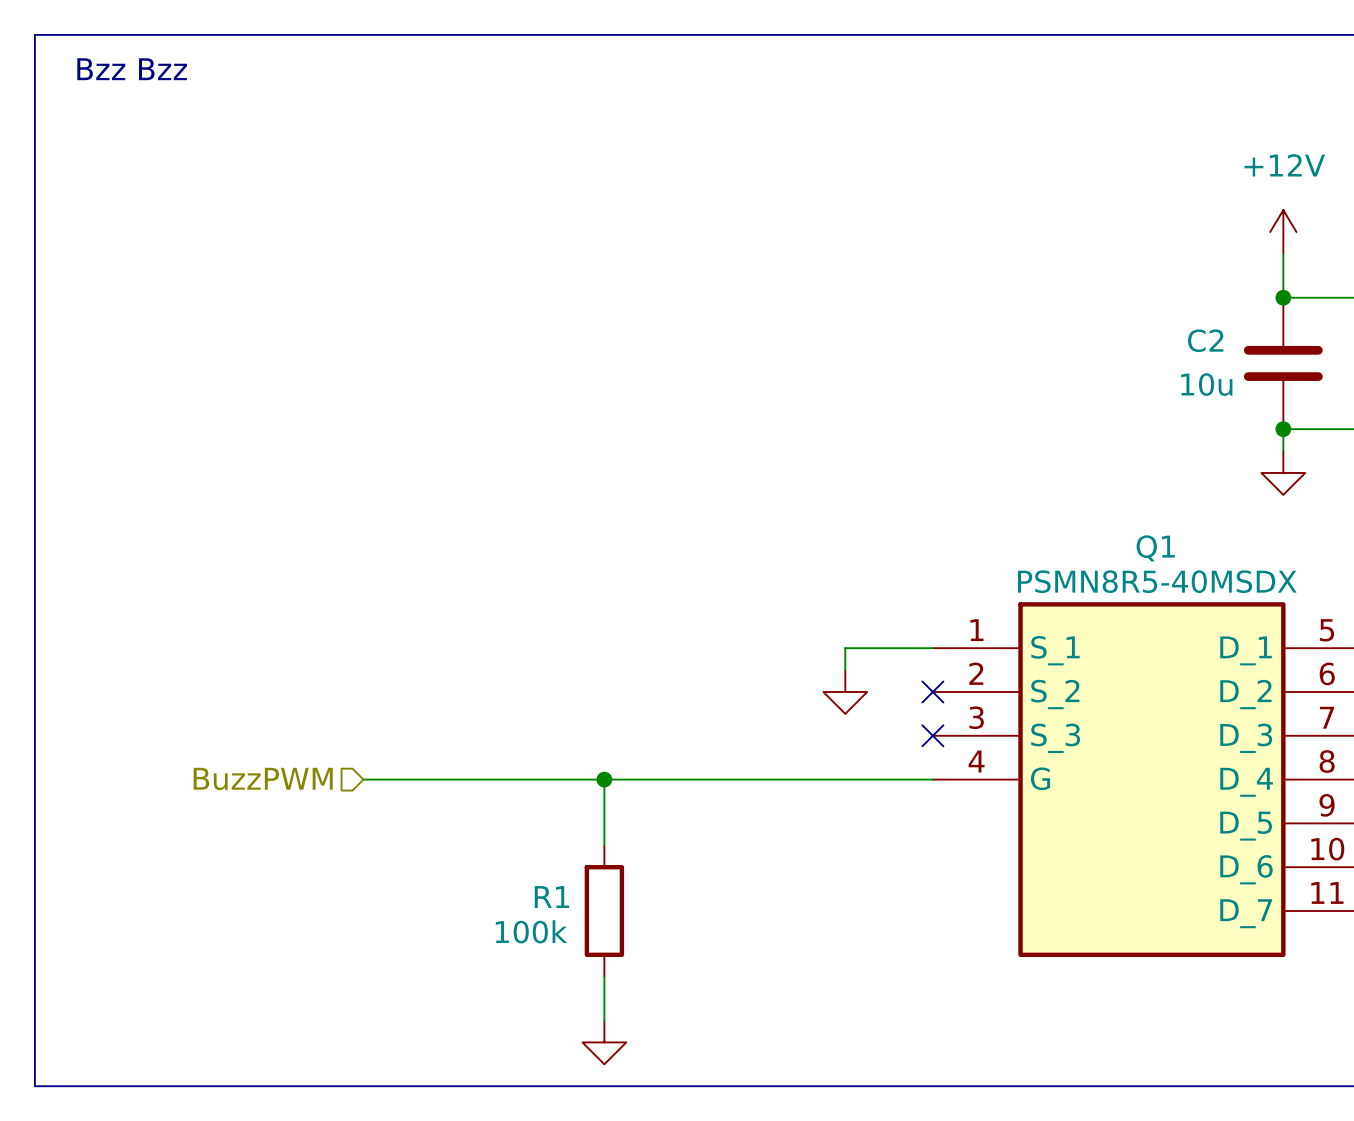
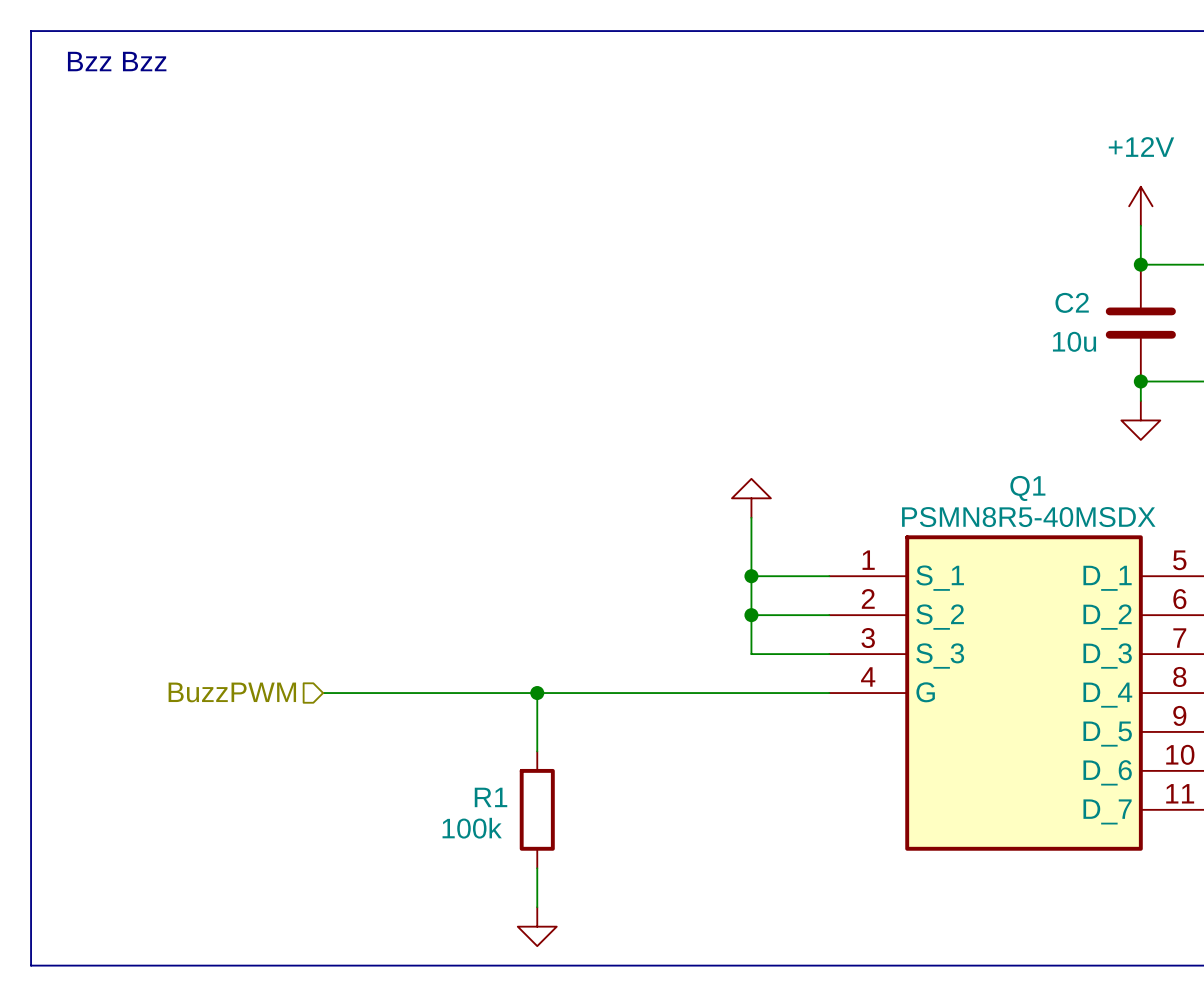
wire: none -> (751, 517) (751, 576)
junction: none -> (751, 576)
wire: none -> (751, 595) (751, 654) (829, 654)
wire: none -> (751, 615) (829, 615)
power symbol rotation: 0° (845, 691) -> 180° (751, 498)
power symbol position: (845, 691) -> (751, 498)
junction: none -> (751, 615)
no-connect mark: (932, 691) -> none
no-connect mark: (932, 735) -> none

